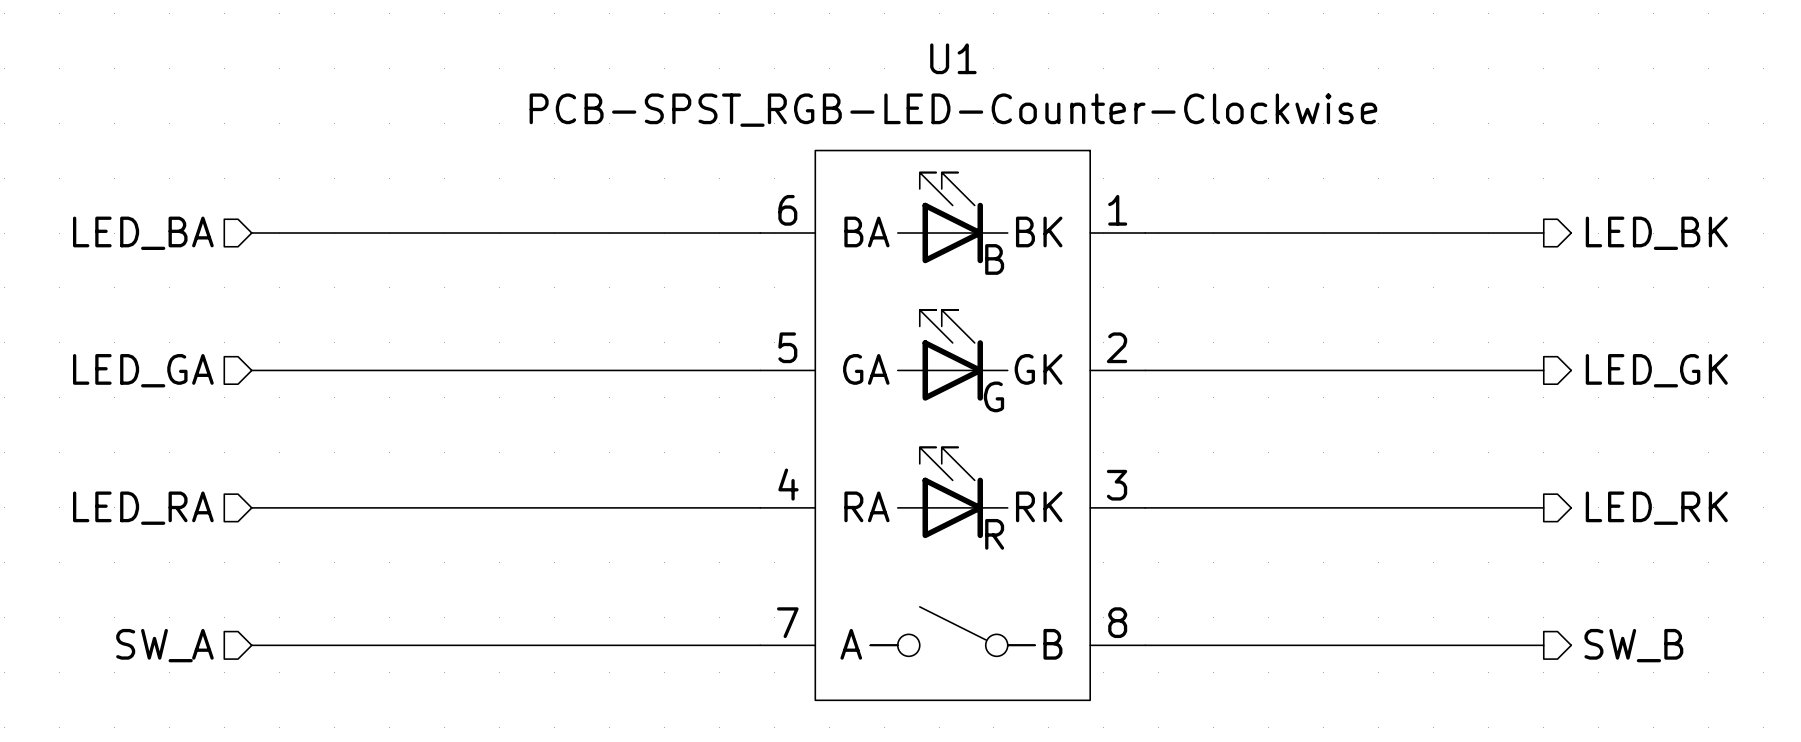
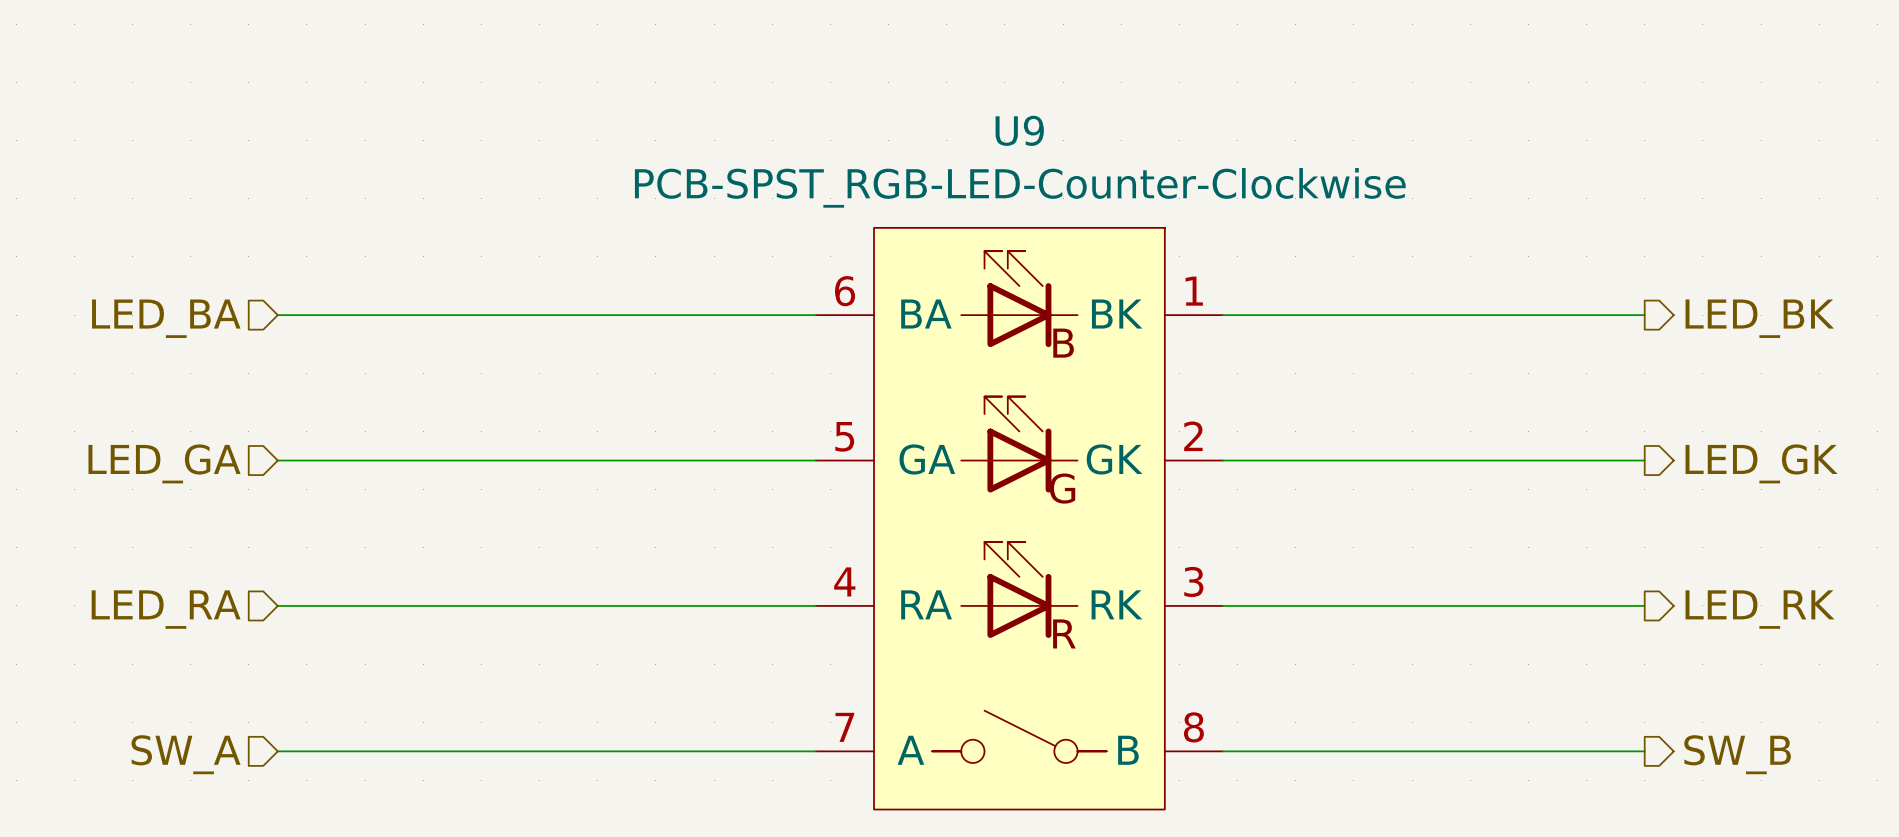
U1 name: U1 (953, 58) -> U9 (1019, 130)

